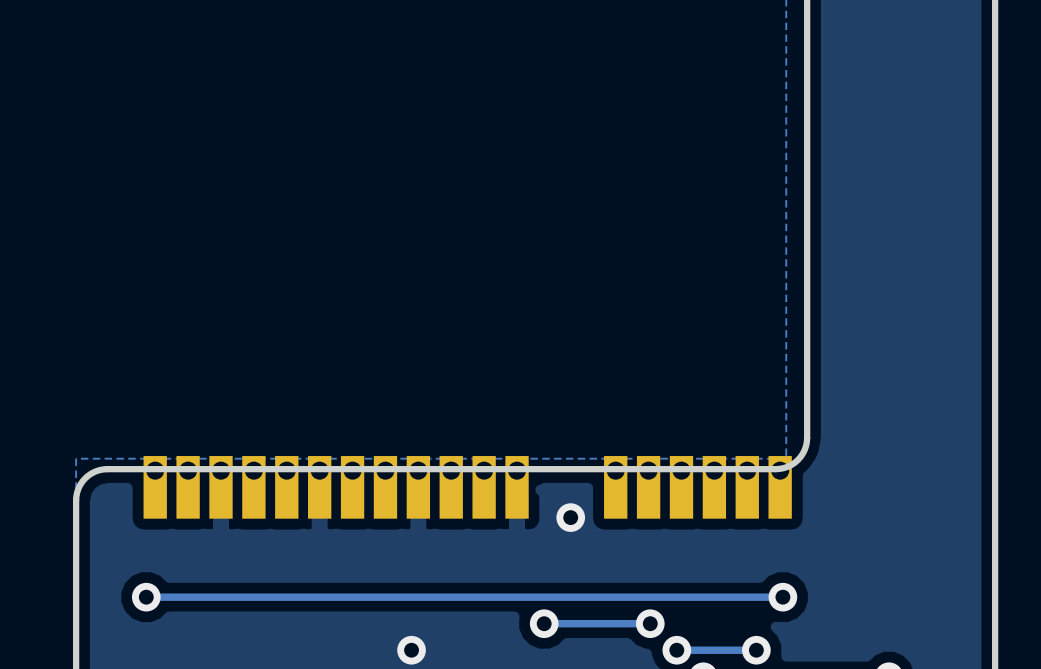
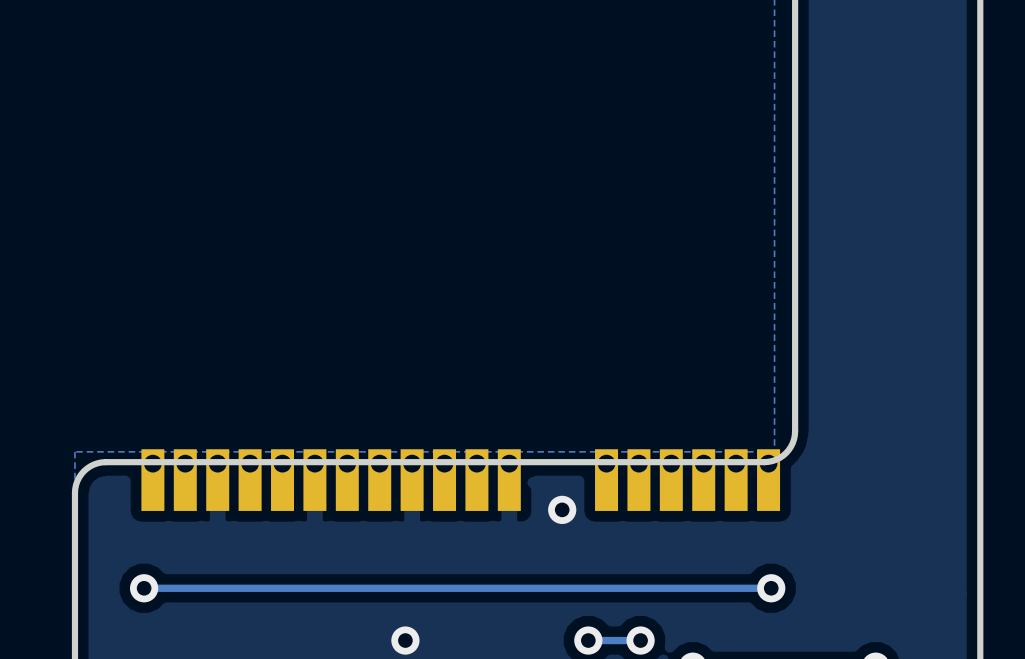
via: (544, 623) -> none
track: (650, 623) (544, 623) -> none
via: (650, 623) -> none
via: none -> (588, 640)
track: none -> (640, 640) (588, 640)
via: none -> (640, 640)
via: (676, 650) -> none
track: (756, 650) (676, 650) -> none
via: (756, 650) -> none

